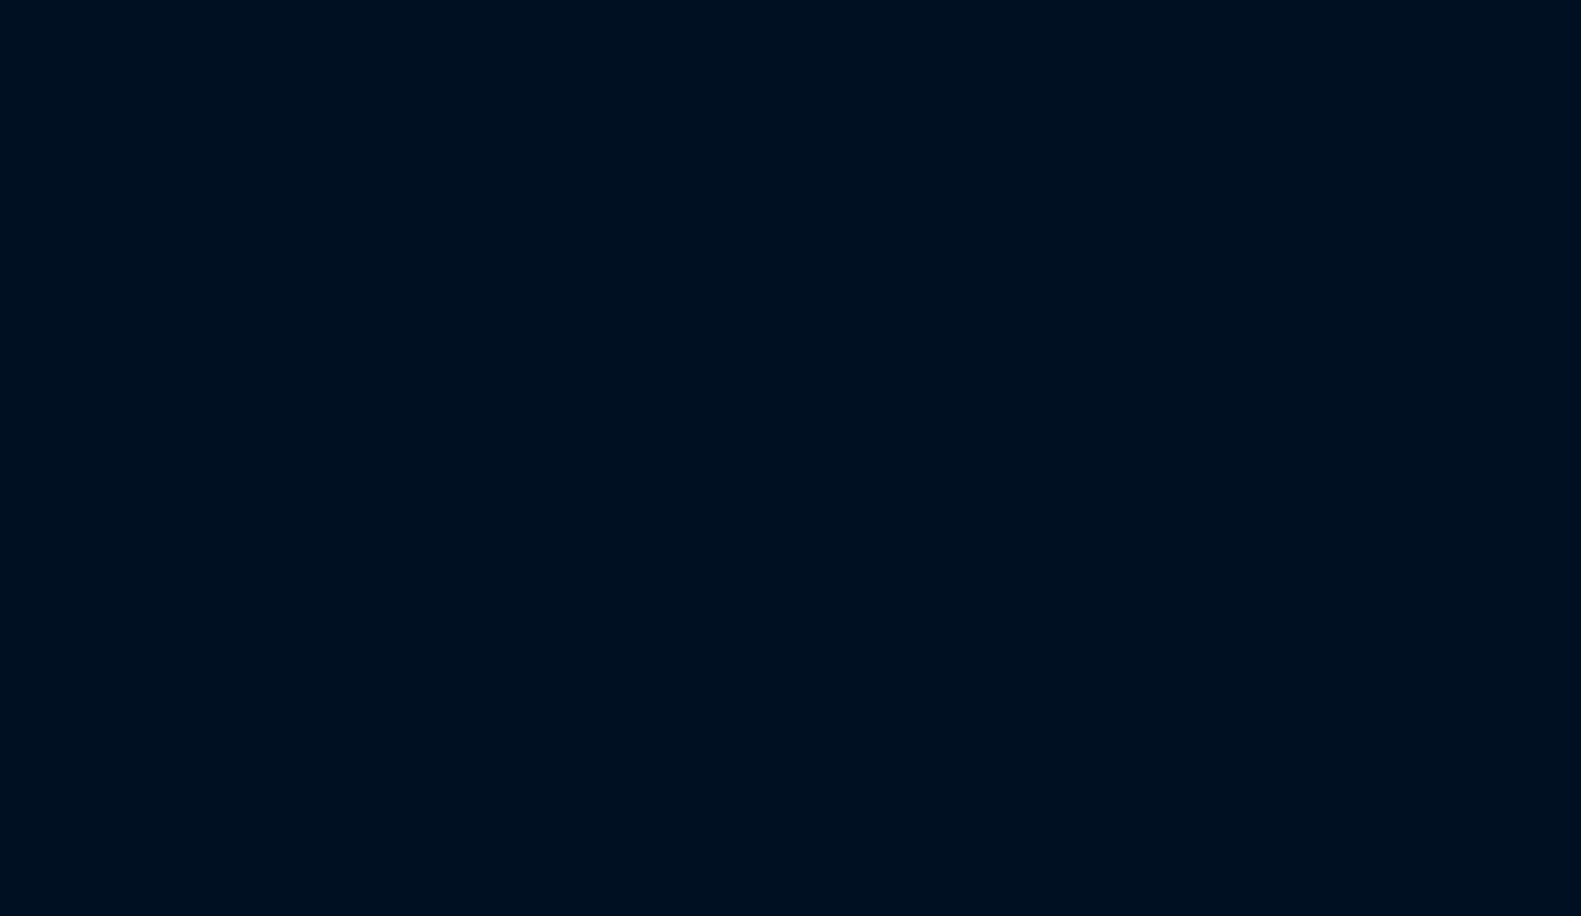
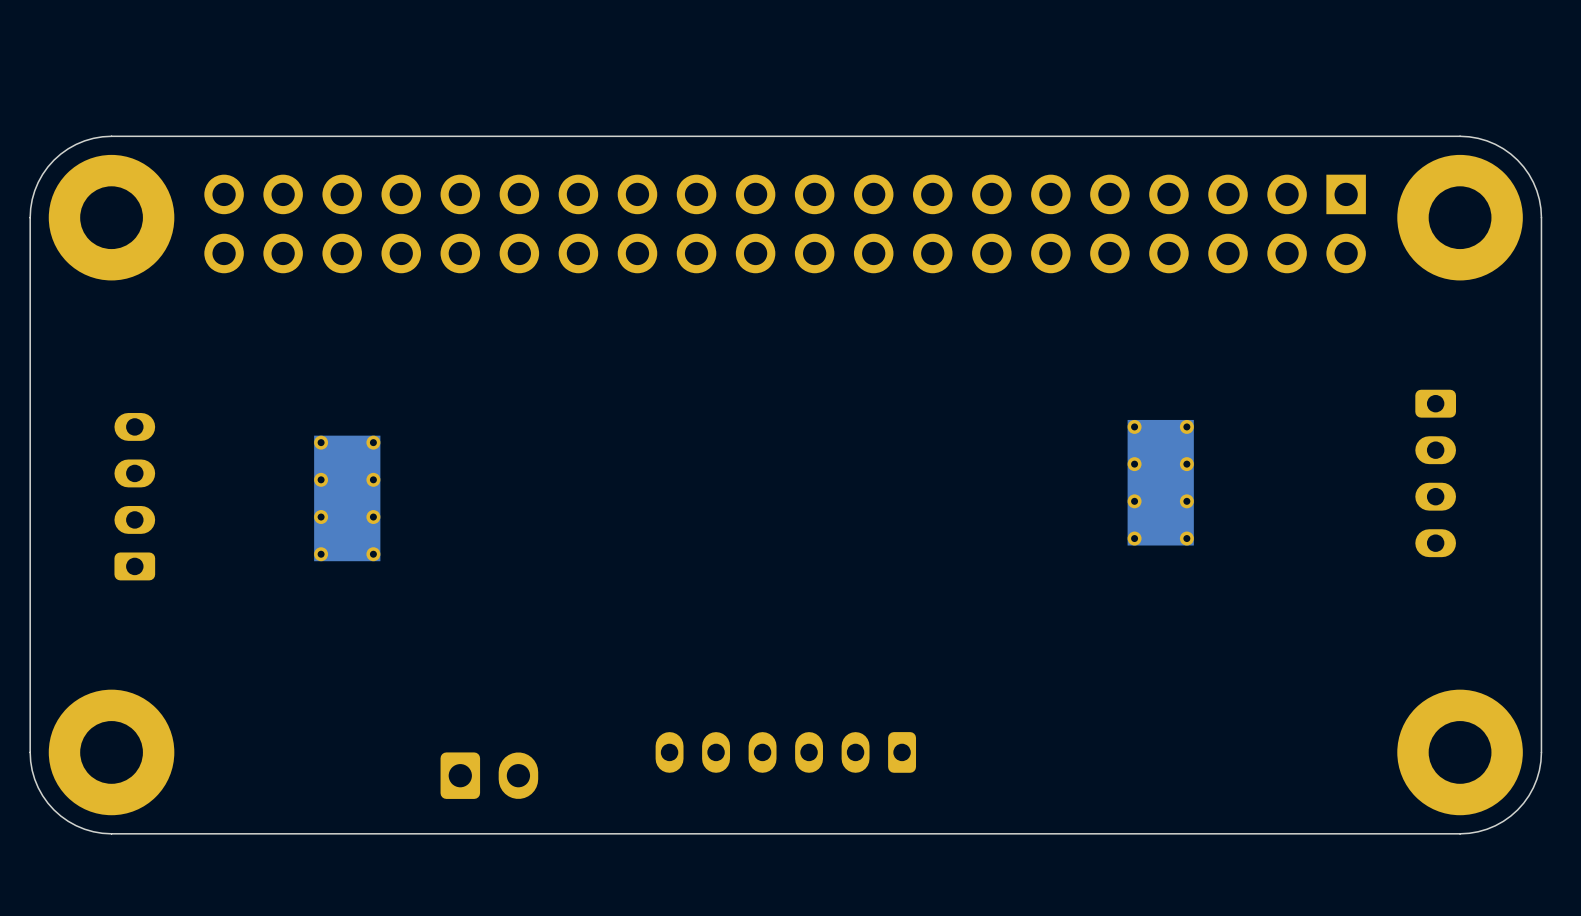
board edge: none -> (1460, 136) (111, 136) (93, 138) (76, 144) (60, 154) (47, 166) (38, 182) (30, 208) (30, 752) (32, 770) (38, 787) (54, 809) (68, 821) (84, 829) (111, 833) (1460, 833) (1478, 831) (1495, 825) (1510, 816) (1523, 803) (1533, 787) (1540, 761) (1541, 217) (1536, 190) (1528, 174) (1517, 160) (1503, 148) (1486, 140) (1460, 136)
part: none -> (111, 217)
part: none -> (1460, 217)
part: none -> (785, 223)
part: none -> (1435, 473)
part: none -> (1160, 482)
part: none -> (134, 496)
part: none -> (347, 498)
part: none -> (111, 752)
part: none -> (785, 752)
part: none -> (1460, 752)
part: none -> (489, 775)

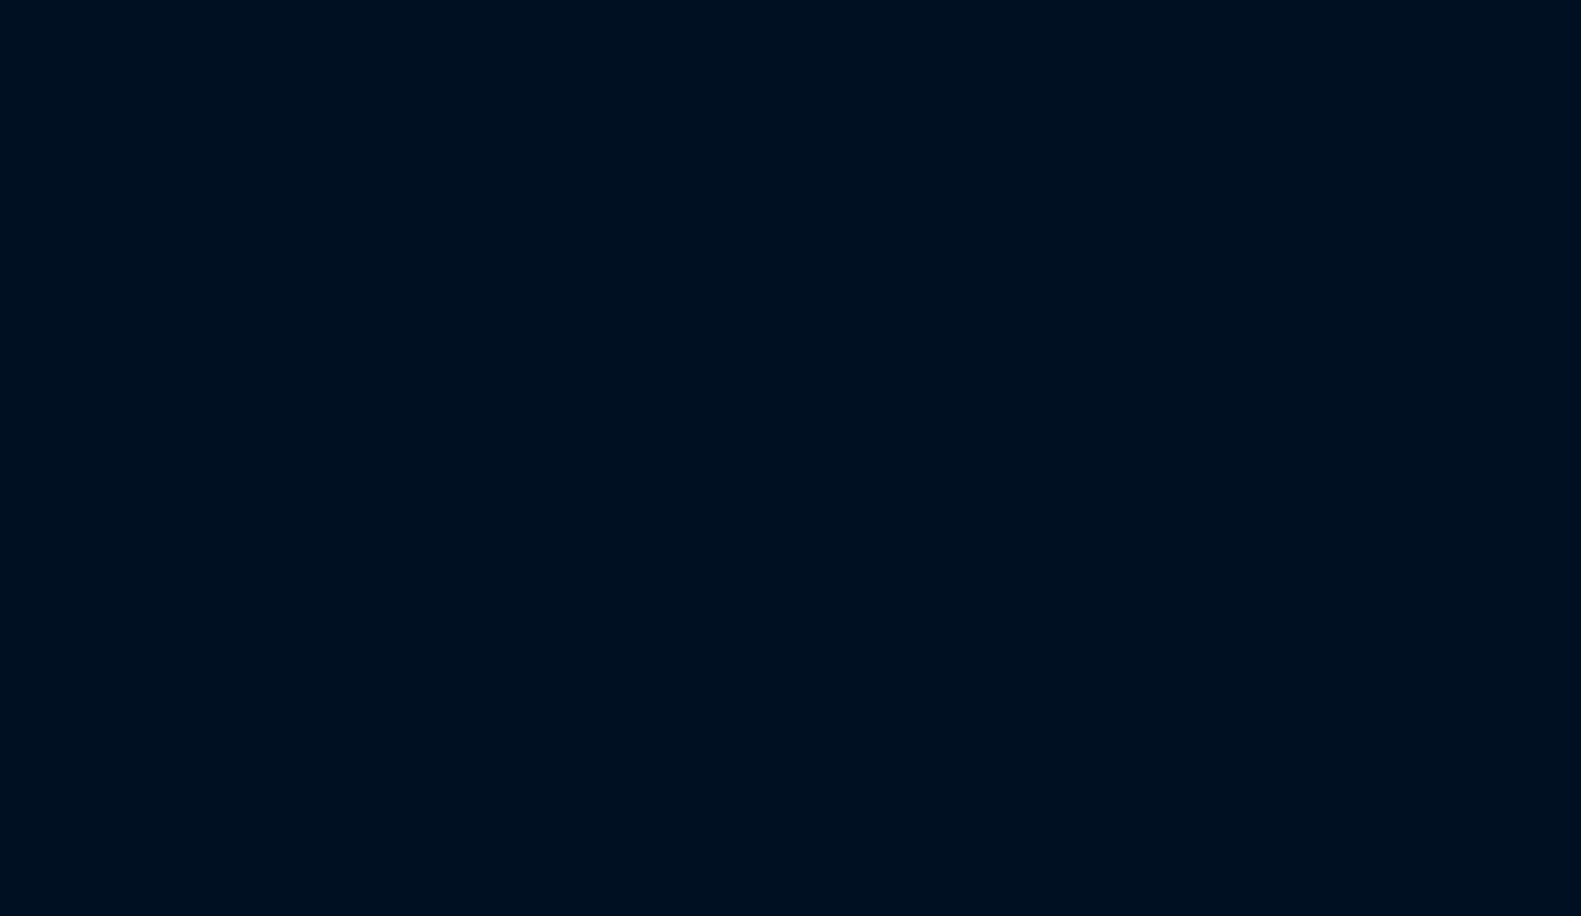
board edge: (1460, 136) (111, 136) (93, 138) (76, 144) (60, 154) (47, 166) (38, 182) (30, 208) (30, 752) (32, 770) (38, 787) (54, 809) (68, 821) (84, 829) (111, 833) (1460, 833) (1478, 831) (1495, 825) (1510, 816) (1523, 803) (1533, 787) (1540, 761) (1541, 217) (1536, 190) (1528, 174) (1517, 160) (1503, 148) (1486, 140) (1460, 136) -> none
part: (111, 217) -> none
part: (1460, 217) -> none
part: (785, 223) -> none
part: (1435, 473) -> none
part: (1160, 482) -> none
part: (134, 496) -> none
part: (347, 498) -> none
part: (111, 752) -> none
part: (785, 752) -> none
part: (1460, 752) -> none
part: (489, 775) -> none

